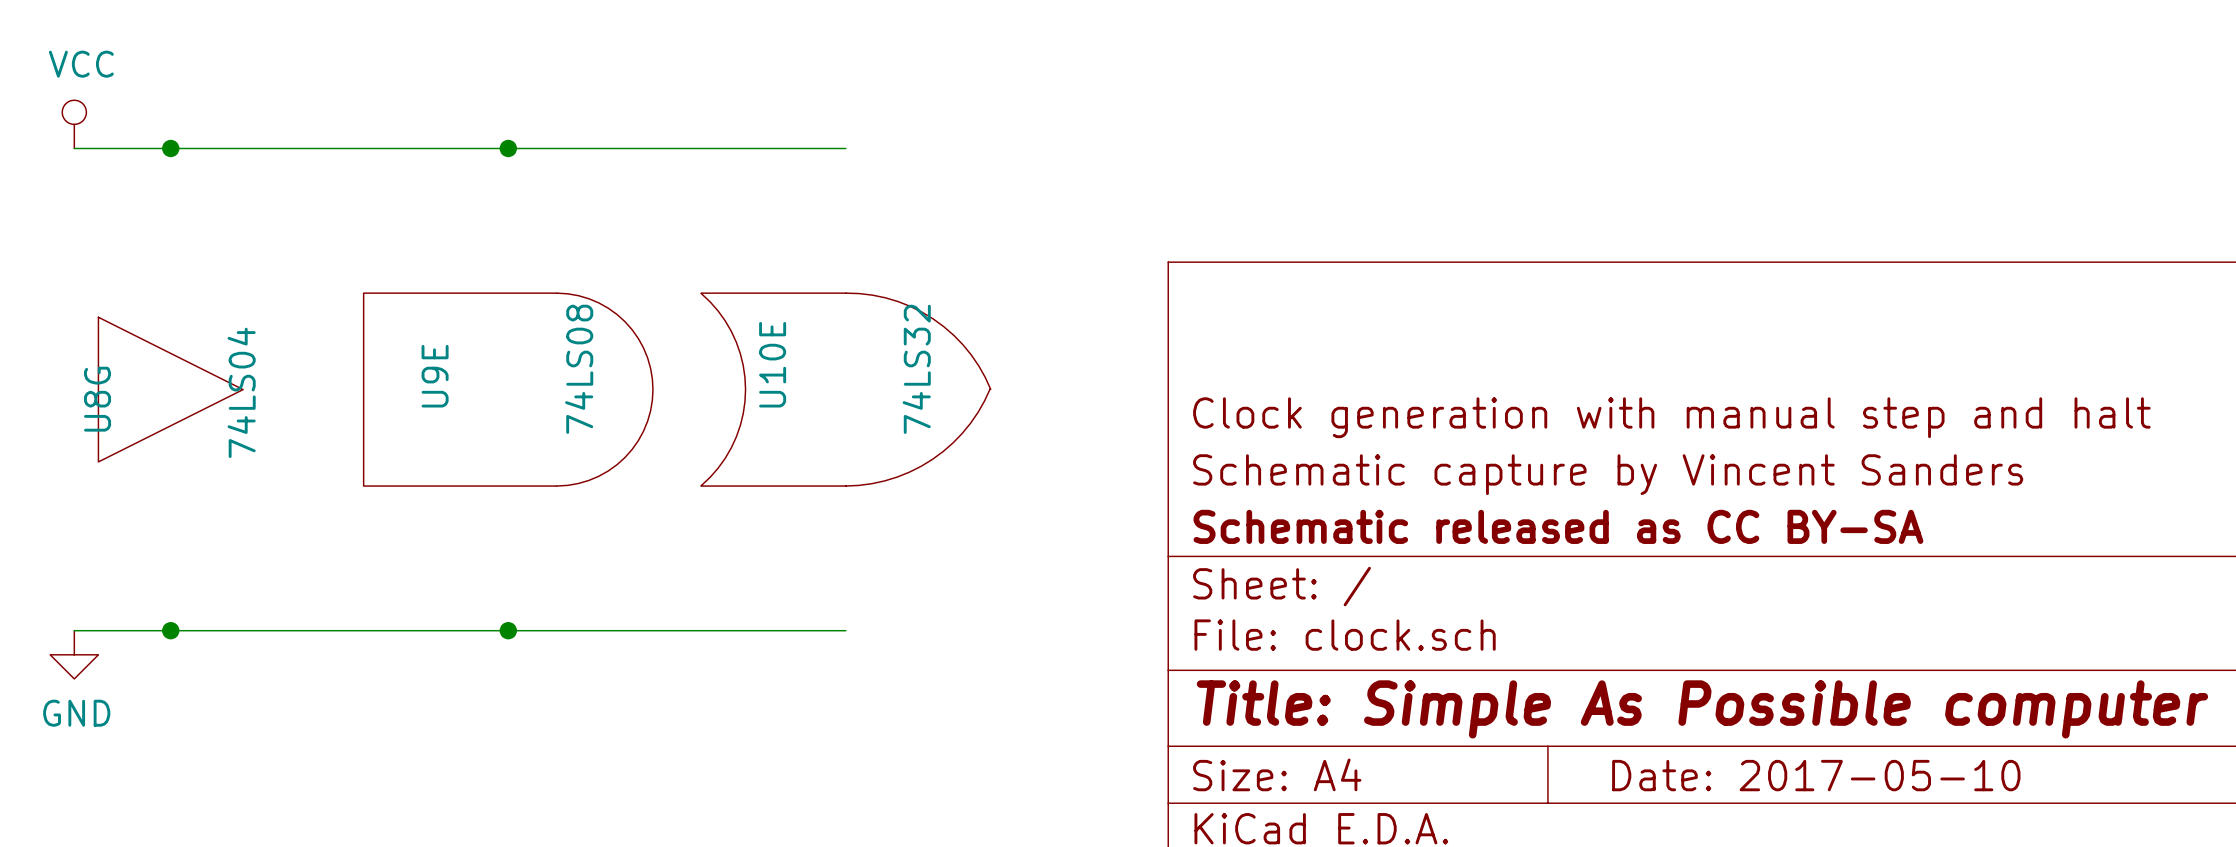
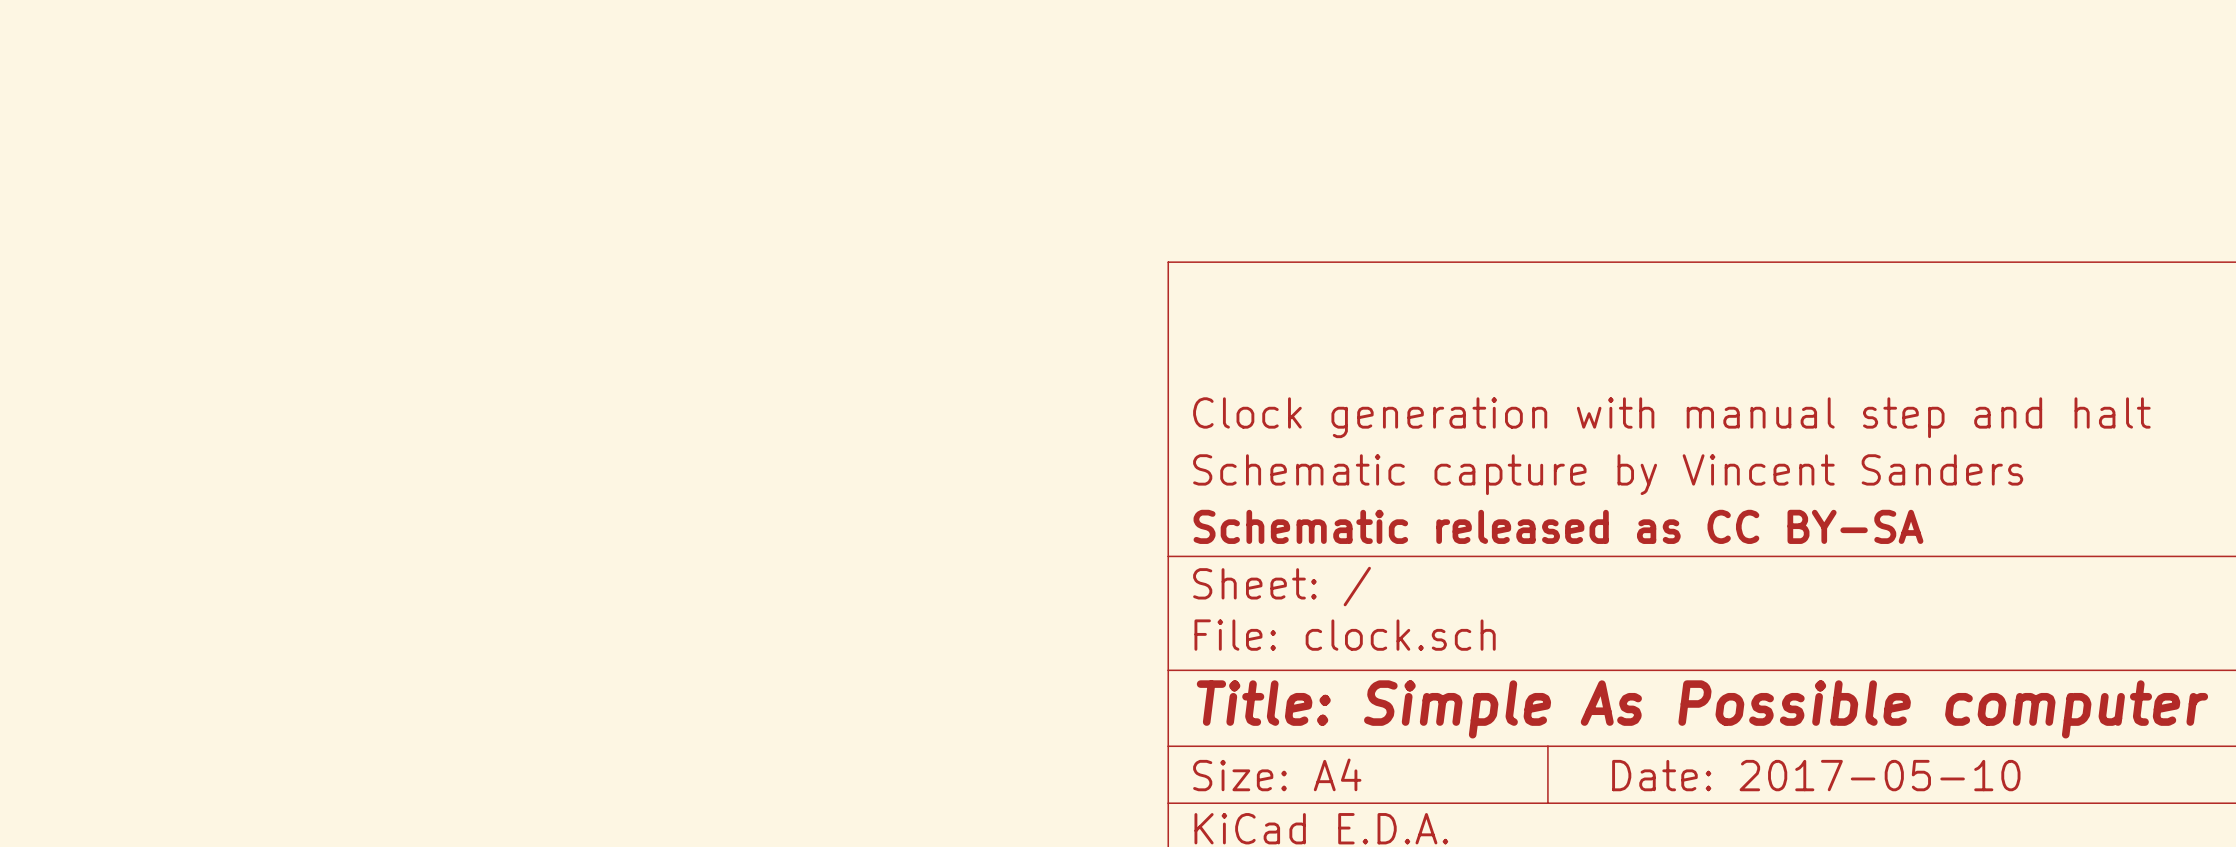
power symbol: VCC (74, 124) -> none
wire: (74, 148) (845, 148) -> none
junction: (170, 148) -> none
junction: (508, 148) -> none
U8G: 74LS04 (170, 389) -> none
U9E: 74LS08 (508, 389) -> none
U10E: 74LS32 (845, 389) -> none
wire: (74, 630) (845, 630) -> none
junction: (170, 630) -> none
junction: (508, 630) -> none
power symbol: GND (74, 654) -> none

